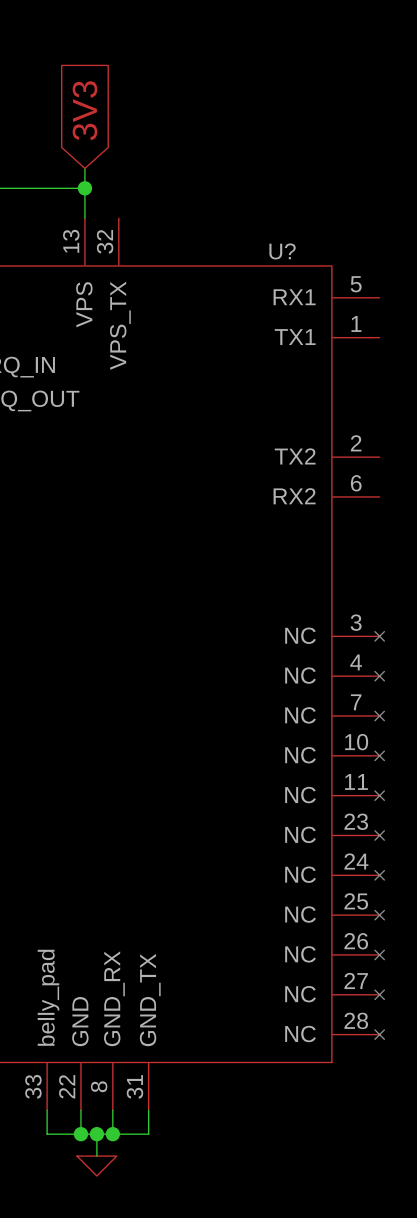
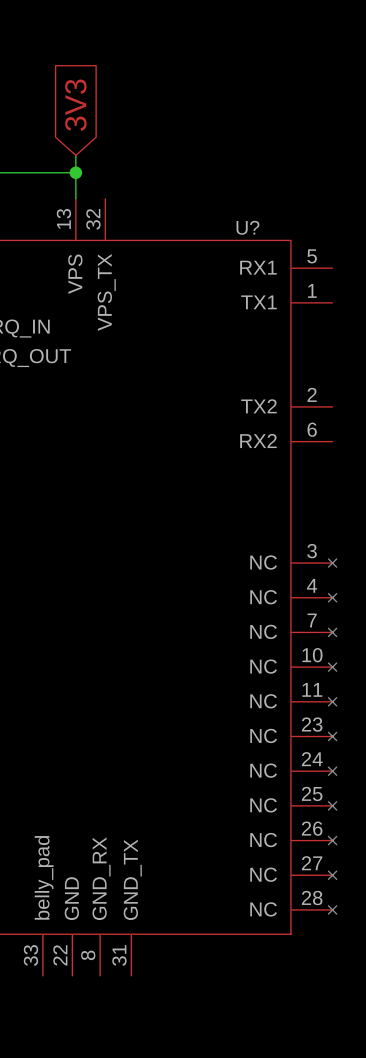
wire: (47, 1110) (47, 1134) (148, 1134) (148, 1110) -> none
wire: (80, 1110) (80, 1134) -> none
wire: (112, 1110) (112, 1134) -> none
junction: (80, 1134) -> none
wire: (96, 1134) (96, 1156) -> none
junction: (96, 1134) -> none
junction: (112, 1134) -> none
power symbol: (96, 1166) -> none

